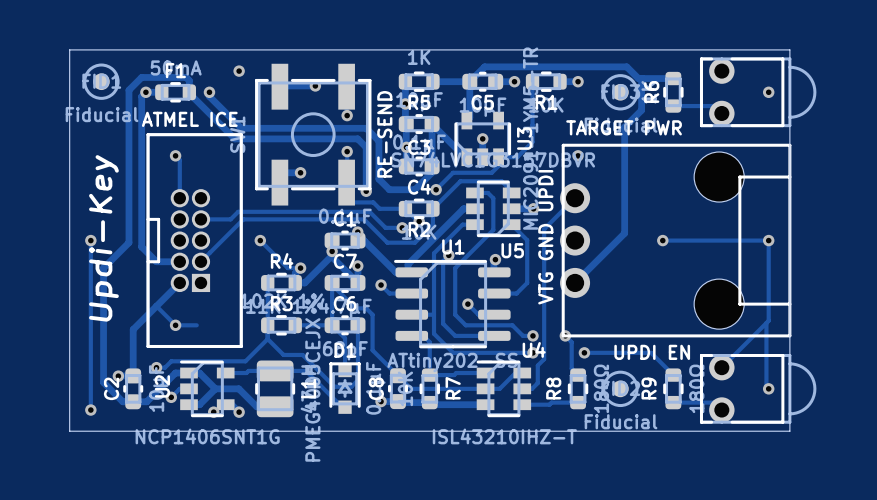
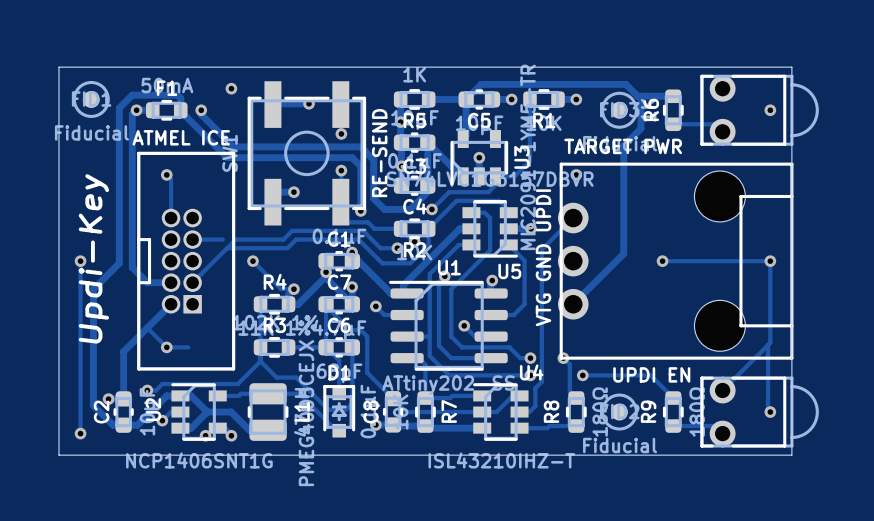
track: (369, 211) (238, 211) (230, 219) -> (364, 231) (292, 230) (283, 239)
track: (290, 219) (302, 219) -> (227, 248) (287, 248) (296, 239)

